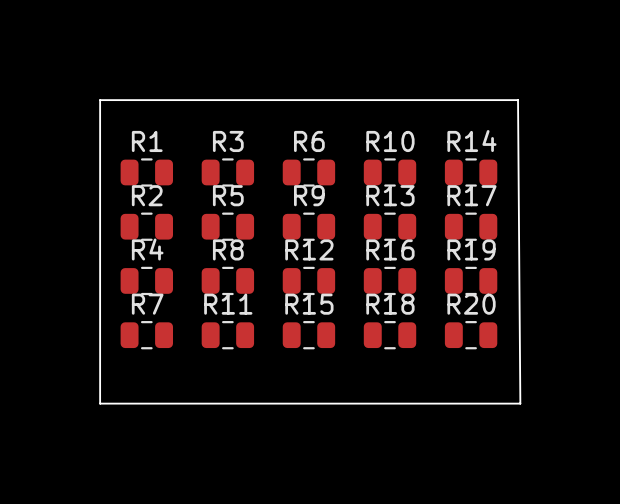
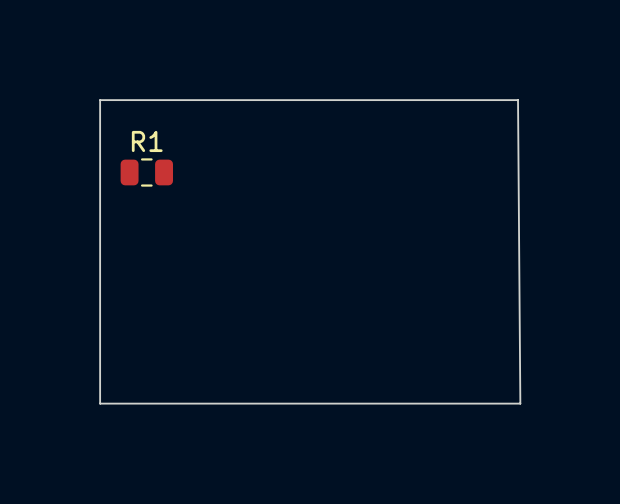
R3: (227, 172) -> none
R6: (308, 172) -> none
R10: (390, 172) -> none
R14: (471, 172) -> none
R2: (146, 226) -> none
R5: (227, 226) -> none
R9: (308, 226) -> none
R13: (390, 226) -> none
R17: (471, 226) -> none
R4: (146, 280) -> none
R8: (227, 280) -> none
R12: (308, 280) -> none
R16: (390, 280) -> none
R19: (471, 280) -> none
R7: (146, 335) -> none
R11: (227, 335) -> none
R15: (308, 335) -> none
R18: (390, 335) -> none
R20: (471, 335) -> none

